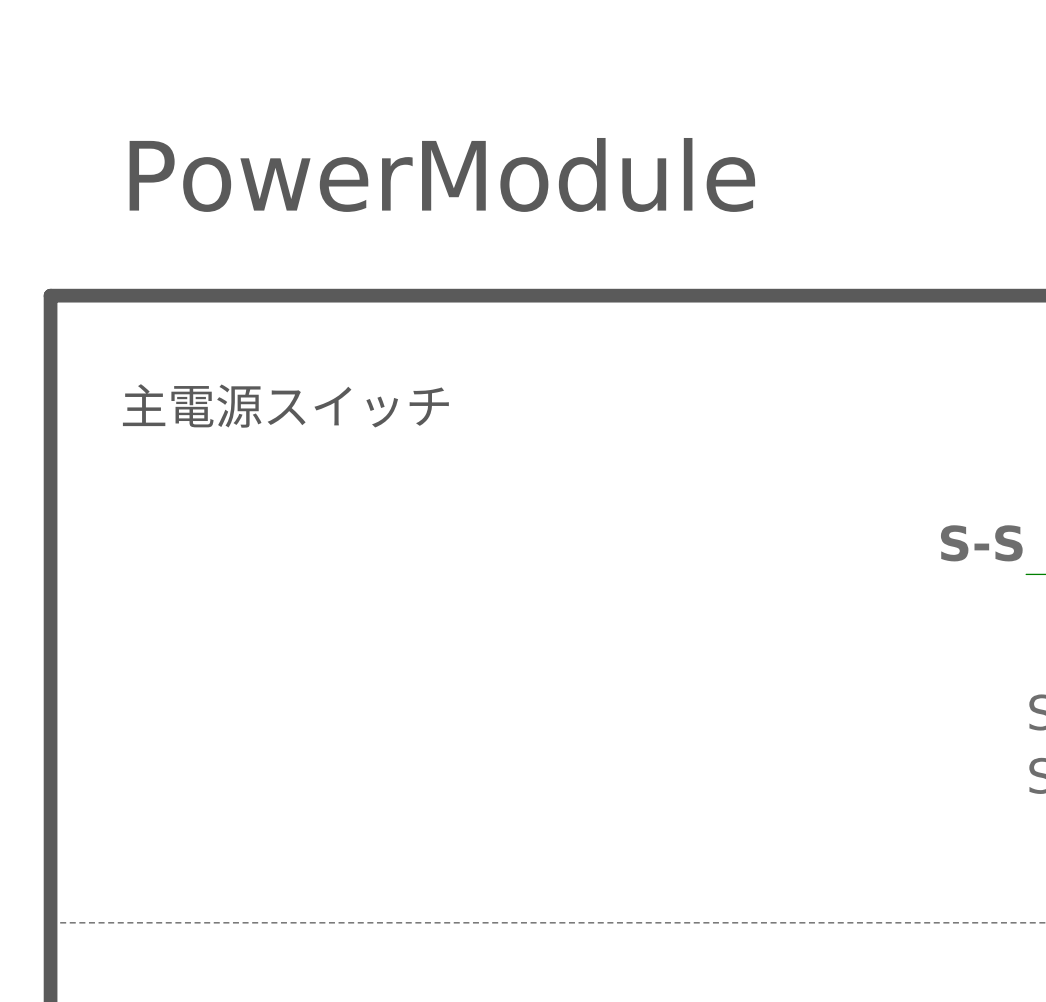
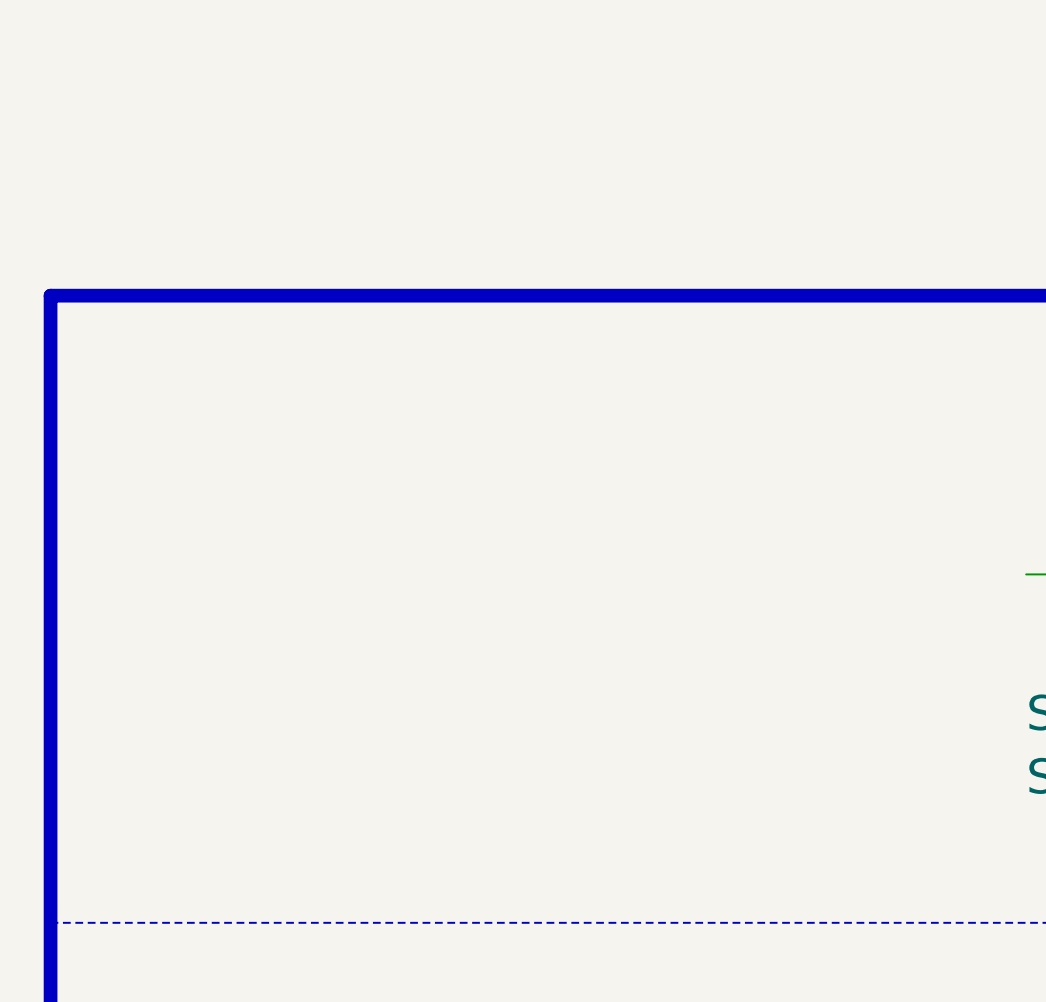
text: PowerModule (442, 174) -> none
text: 主電源スイッチ (285, 405) -> none
label: S-S (981, 543) -> none

